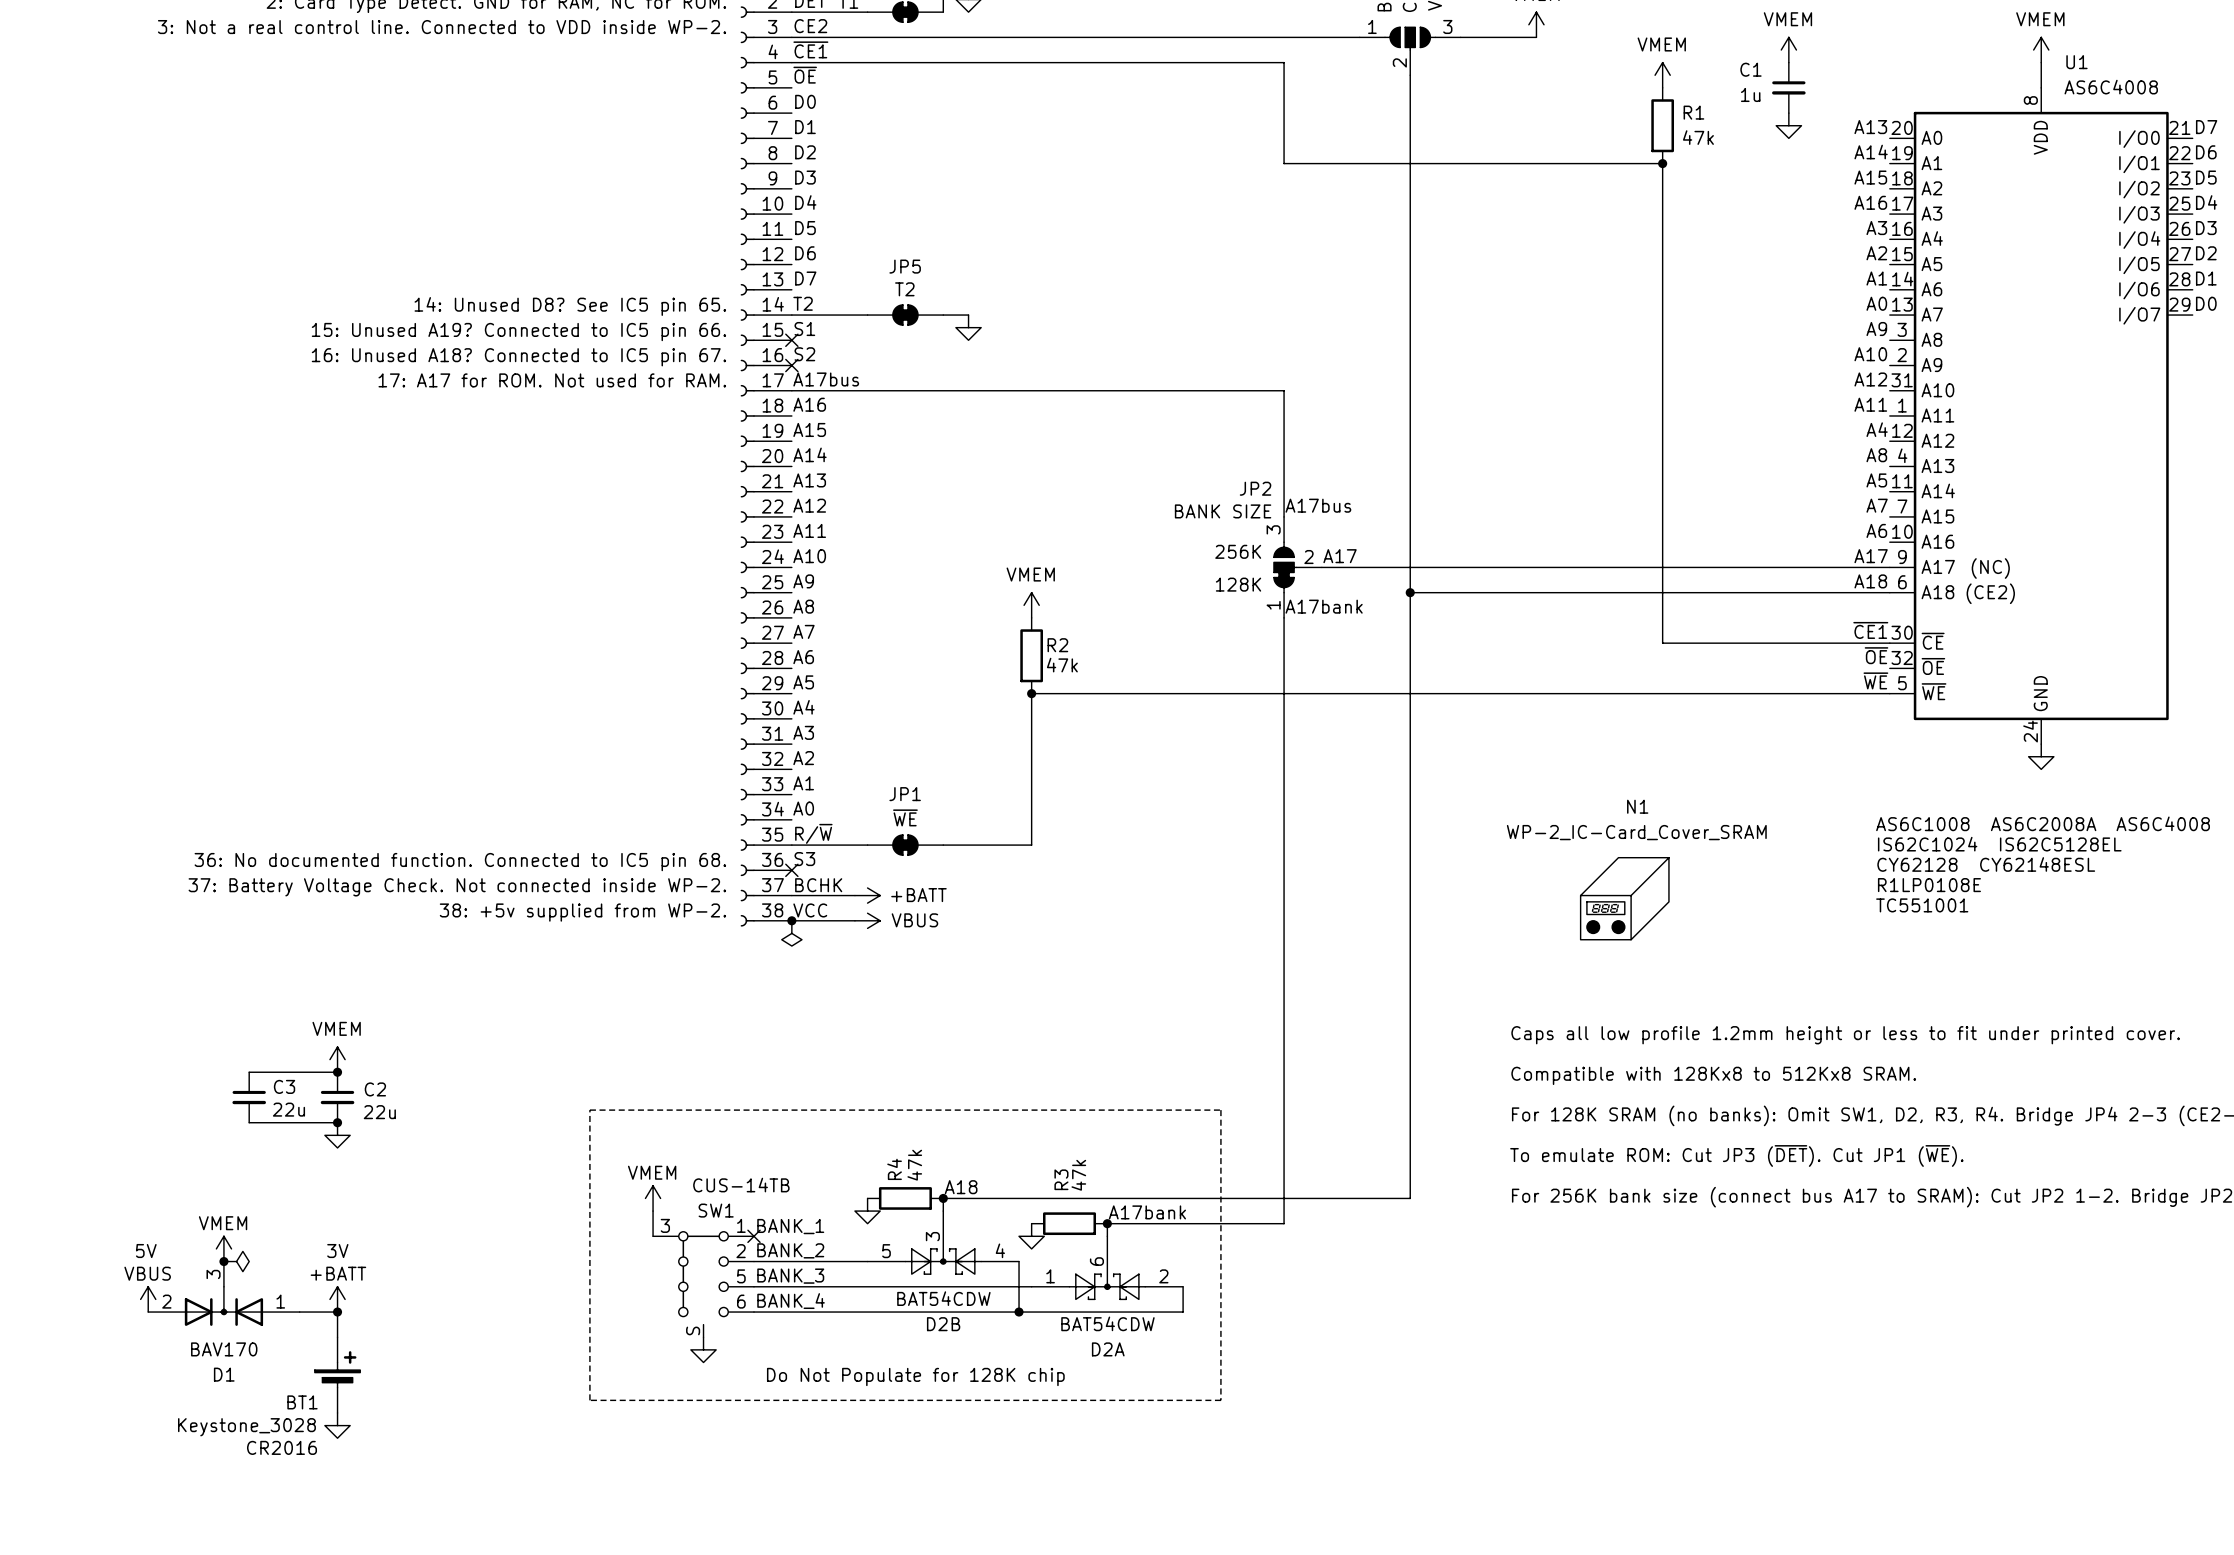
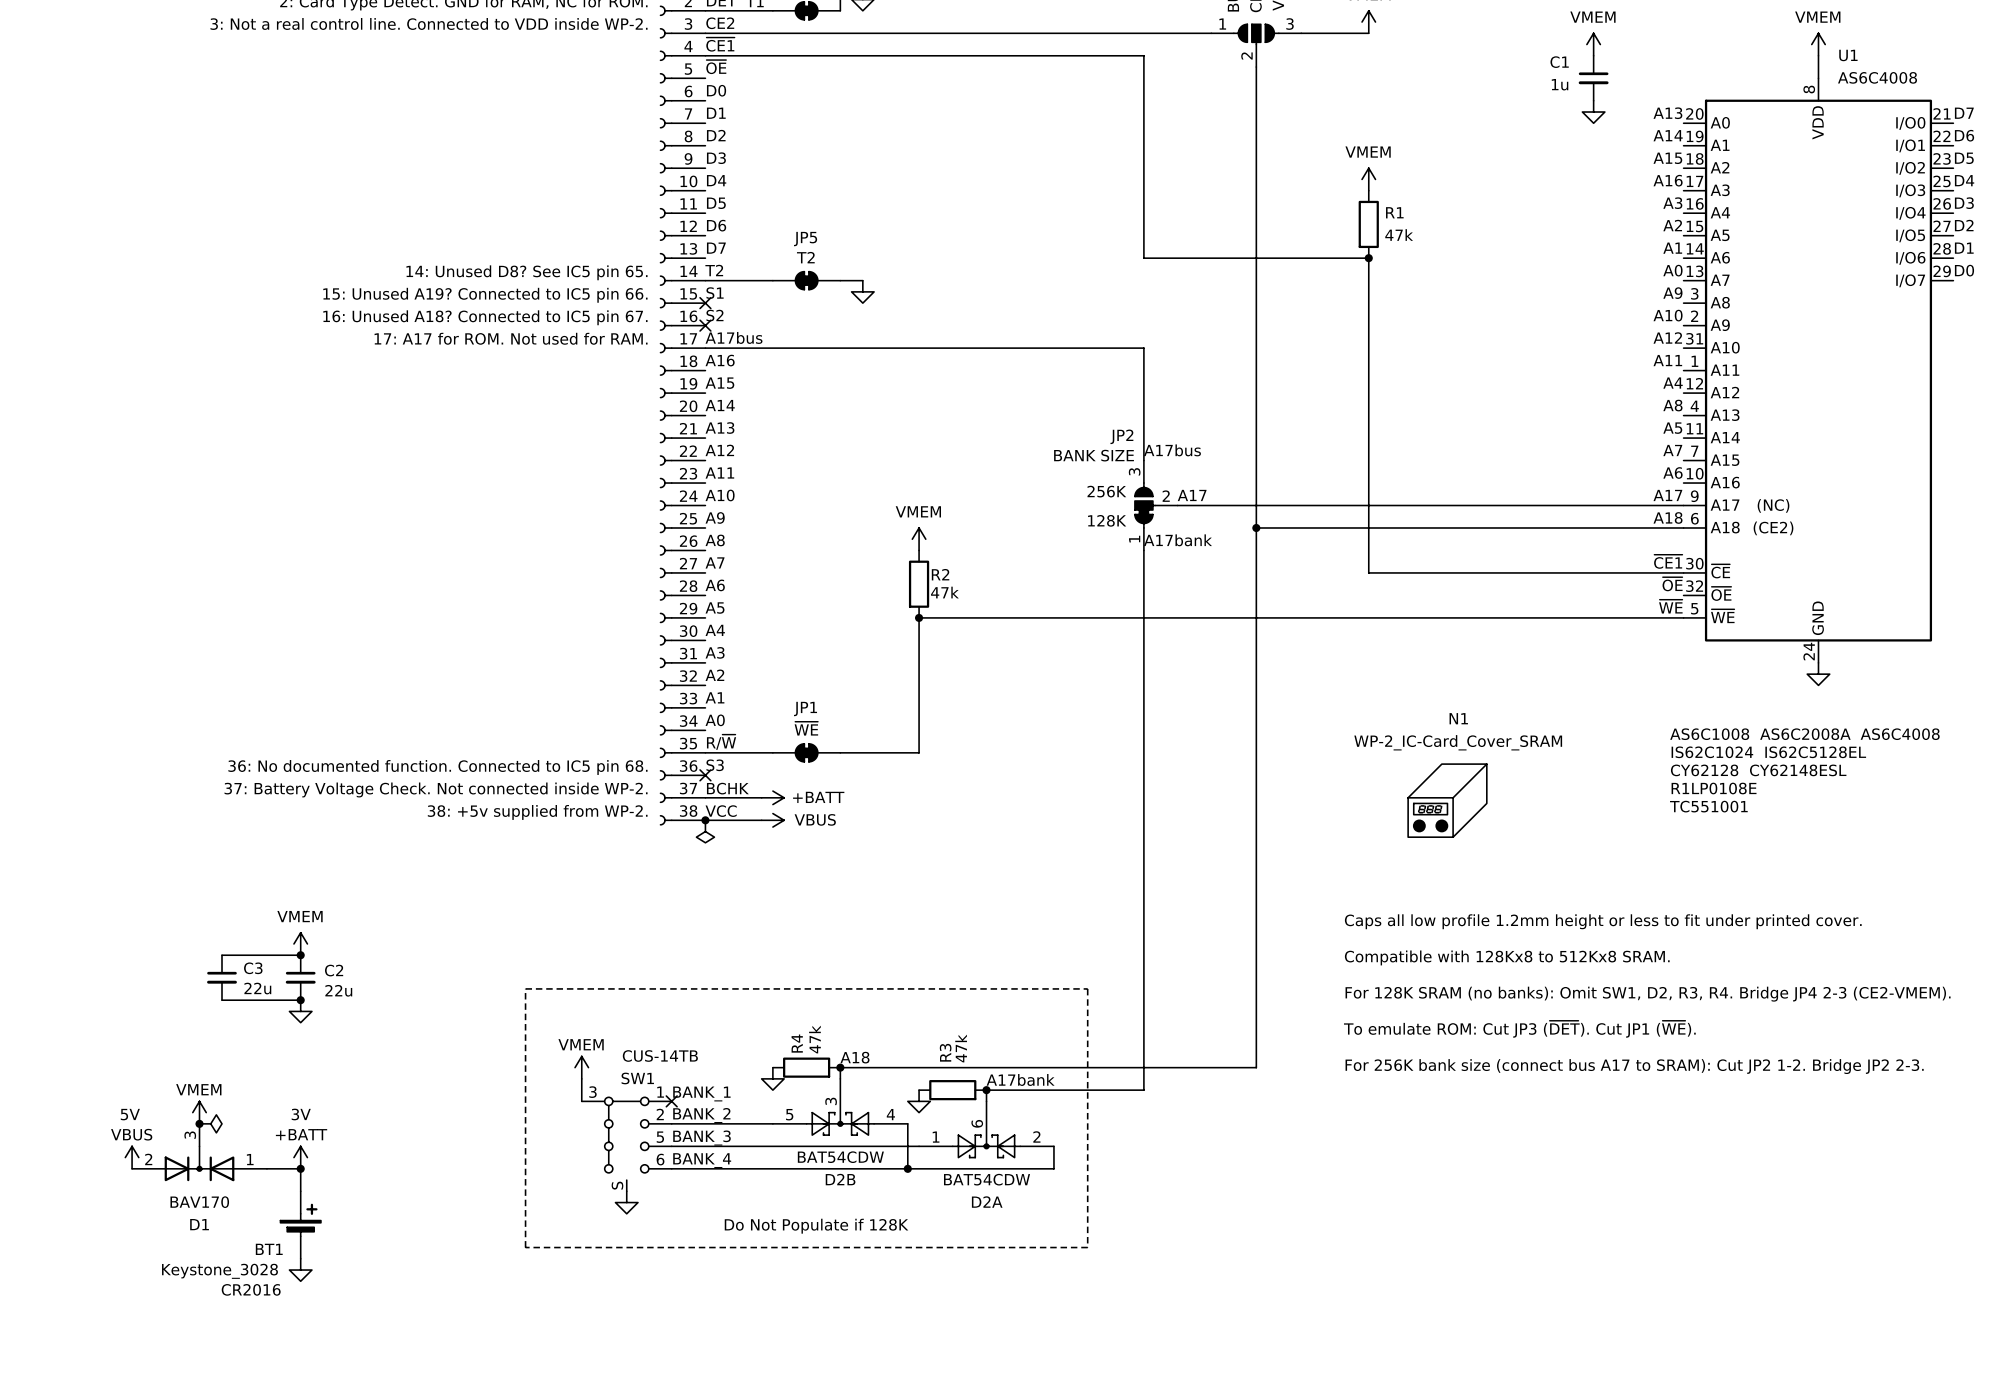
power symbol position: VMEM (1662, 75) -> VMEM (1368, 179)
R1 position: (1662, 125) -> (1368, 224)
wire: (1284, 163) (1662, 163) (1662, 643) -> (1143, 145) (1143, 258) (1368, 258) (1368, 572) (1481, 572)
junction: (1662, 163) -> none
junction: none -> (1368, 258)
text: Do Not Populate for 128K chip (915, 1376) -> Do Not Populate if 128K (816, 1226)

